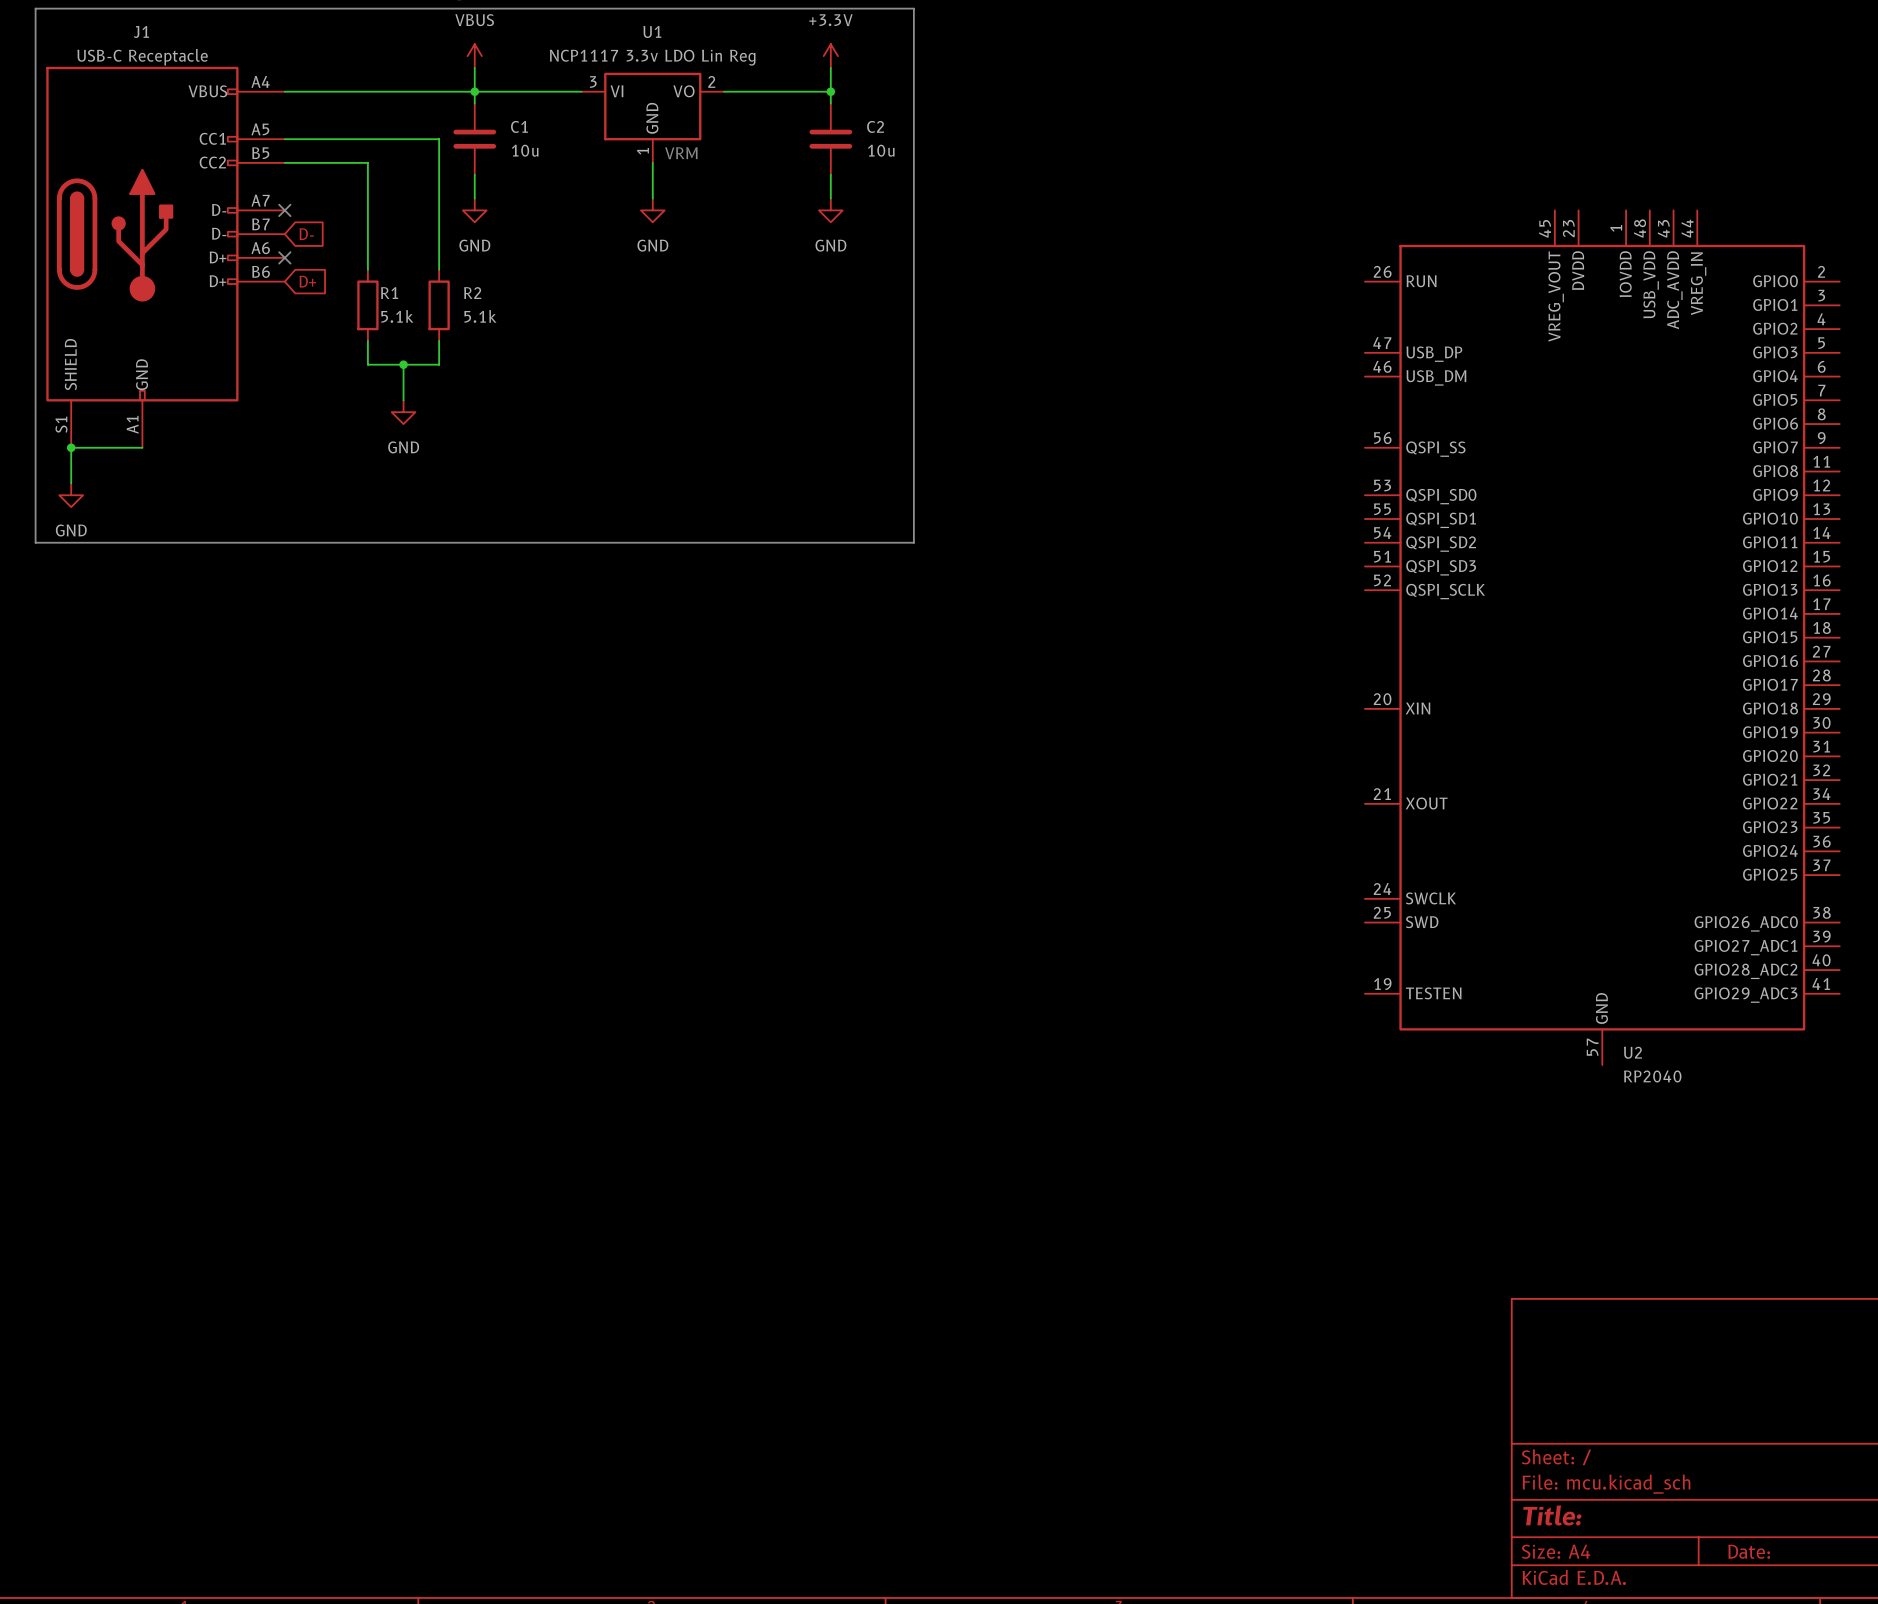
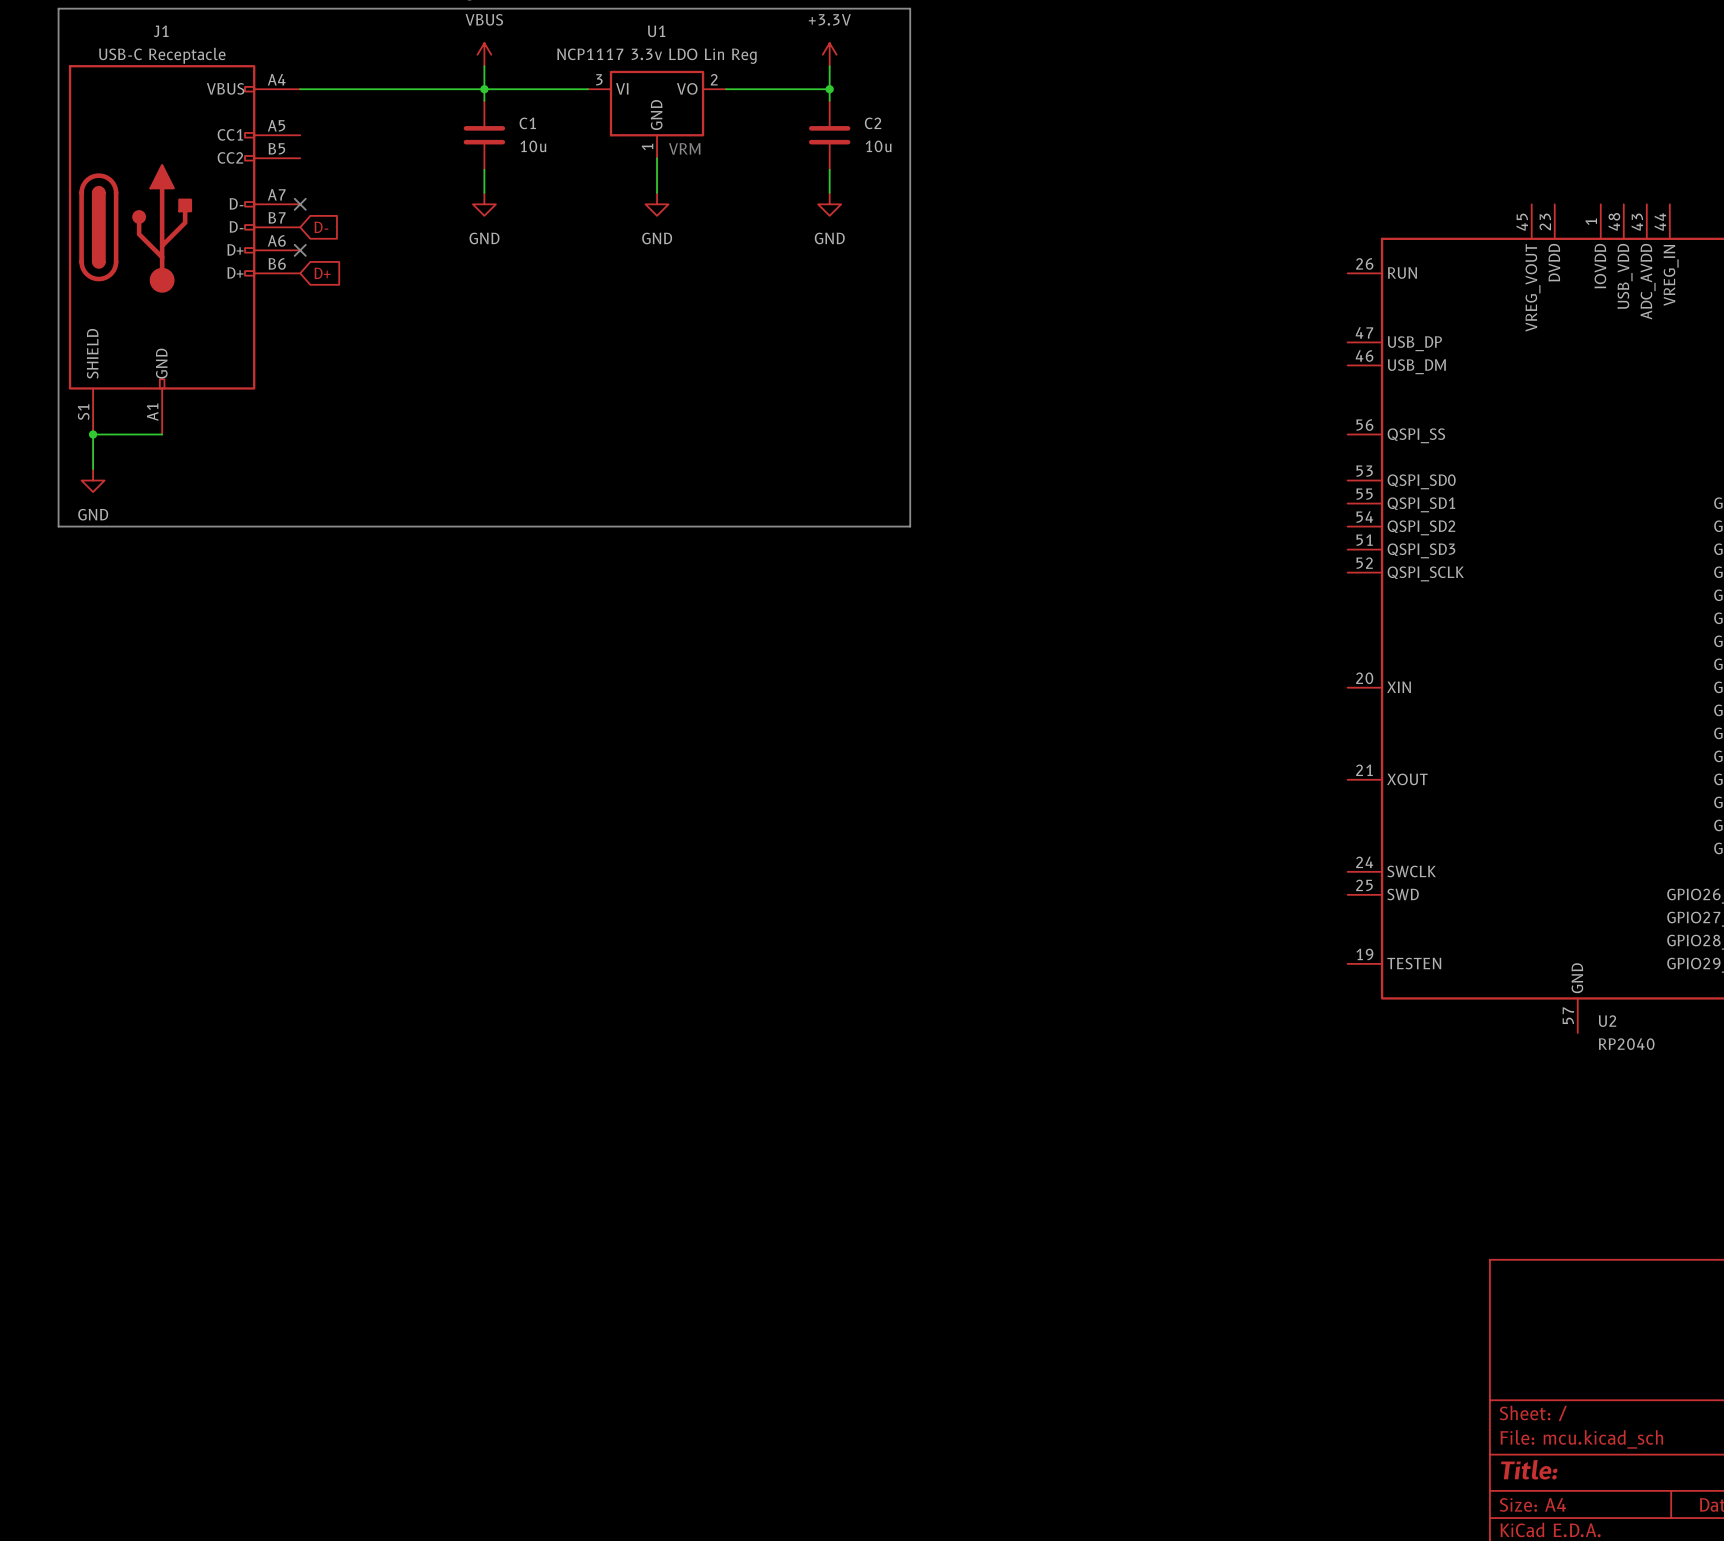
wire: (284, 139) (439, 139) (439, 269) -> none
wire: (284, 162) (367, 162) (367, 269) -> none
R1: 5.1k (367, 305) -> none
R2: 5.1k (439, 305) -> none
wire: (367, 340) (367, 364) (439, 364) (439, 340) -> none
wire: (403, 364) (403, 400) -> none
junction: (403, 364) -> none
power symbol: GND (403, 412) -> none

